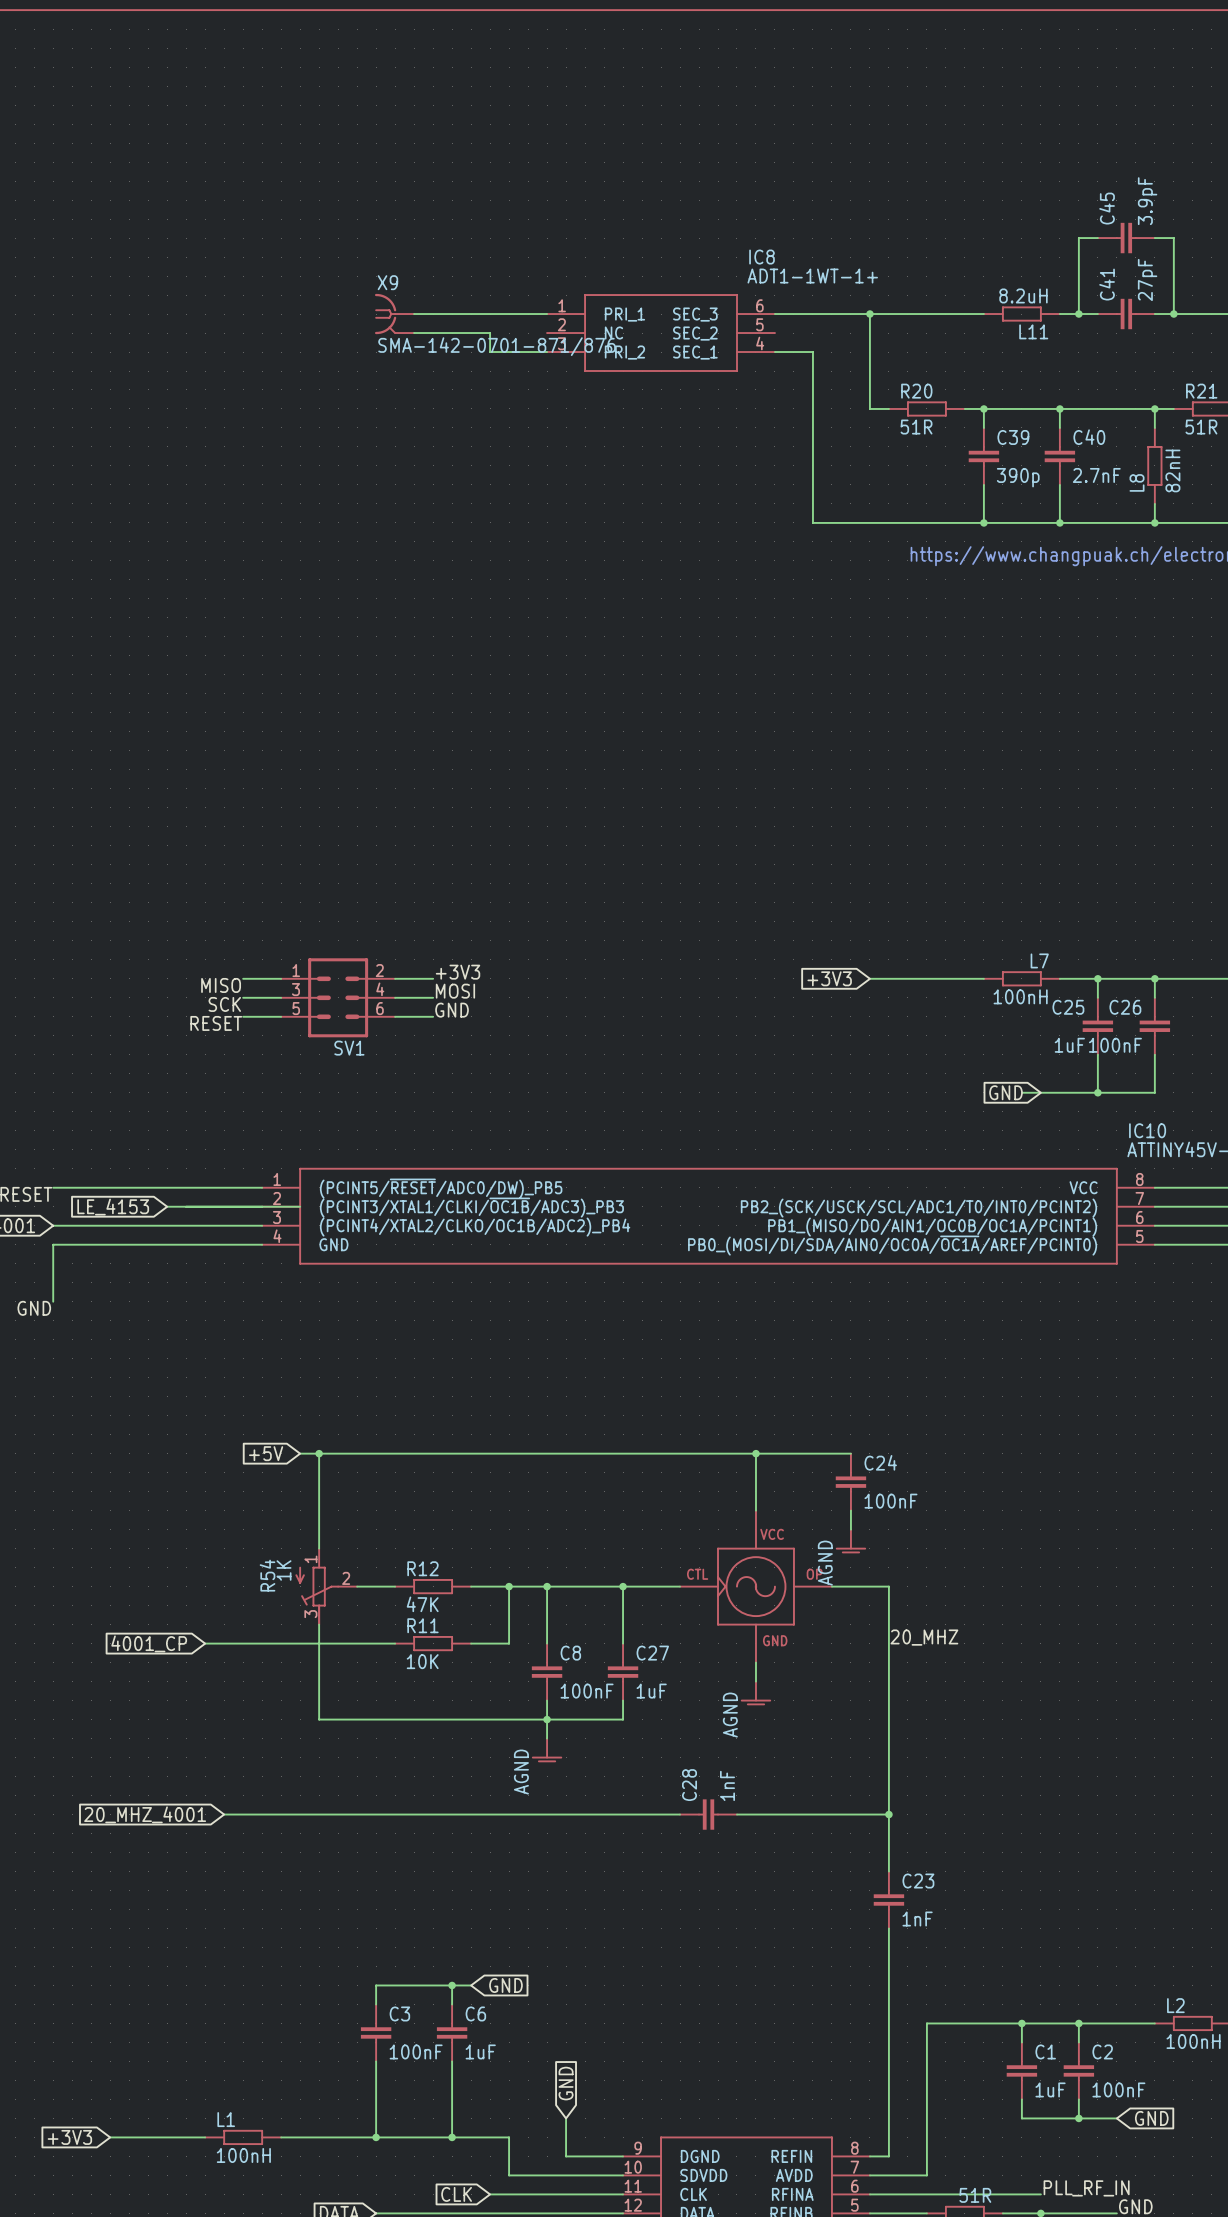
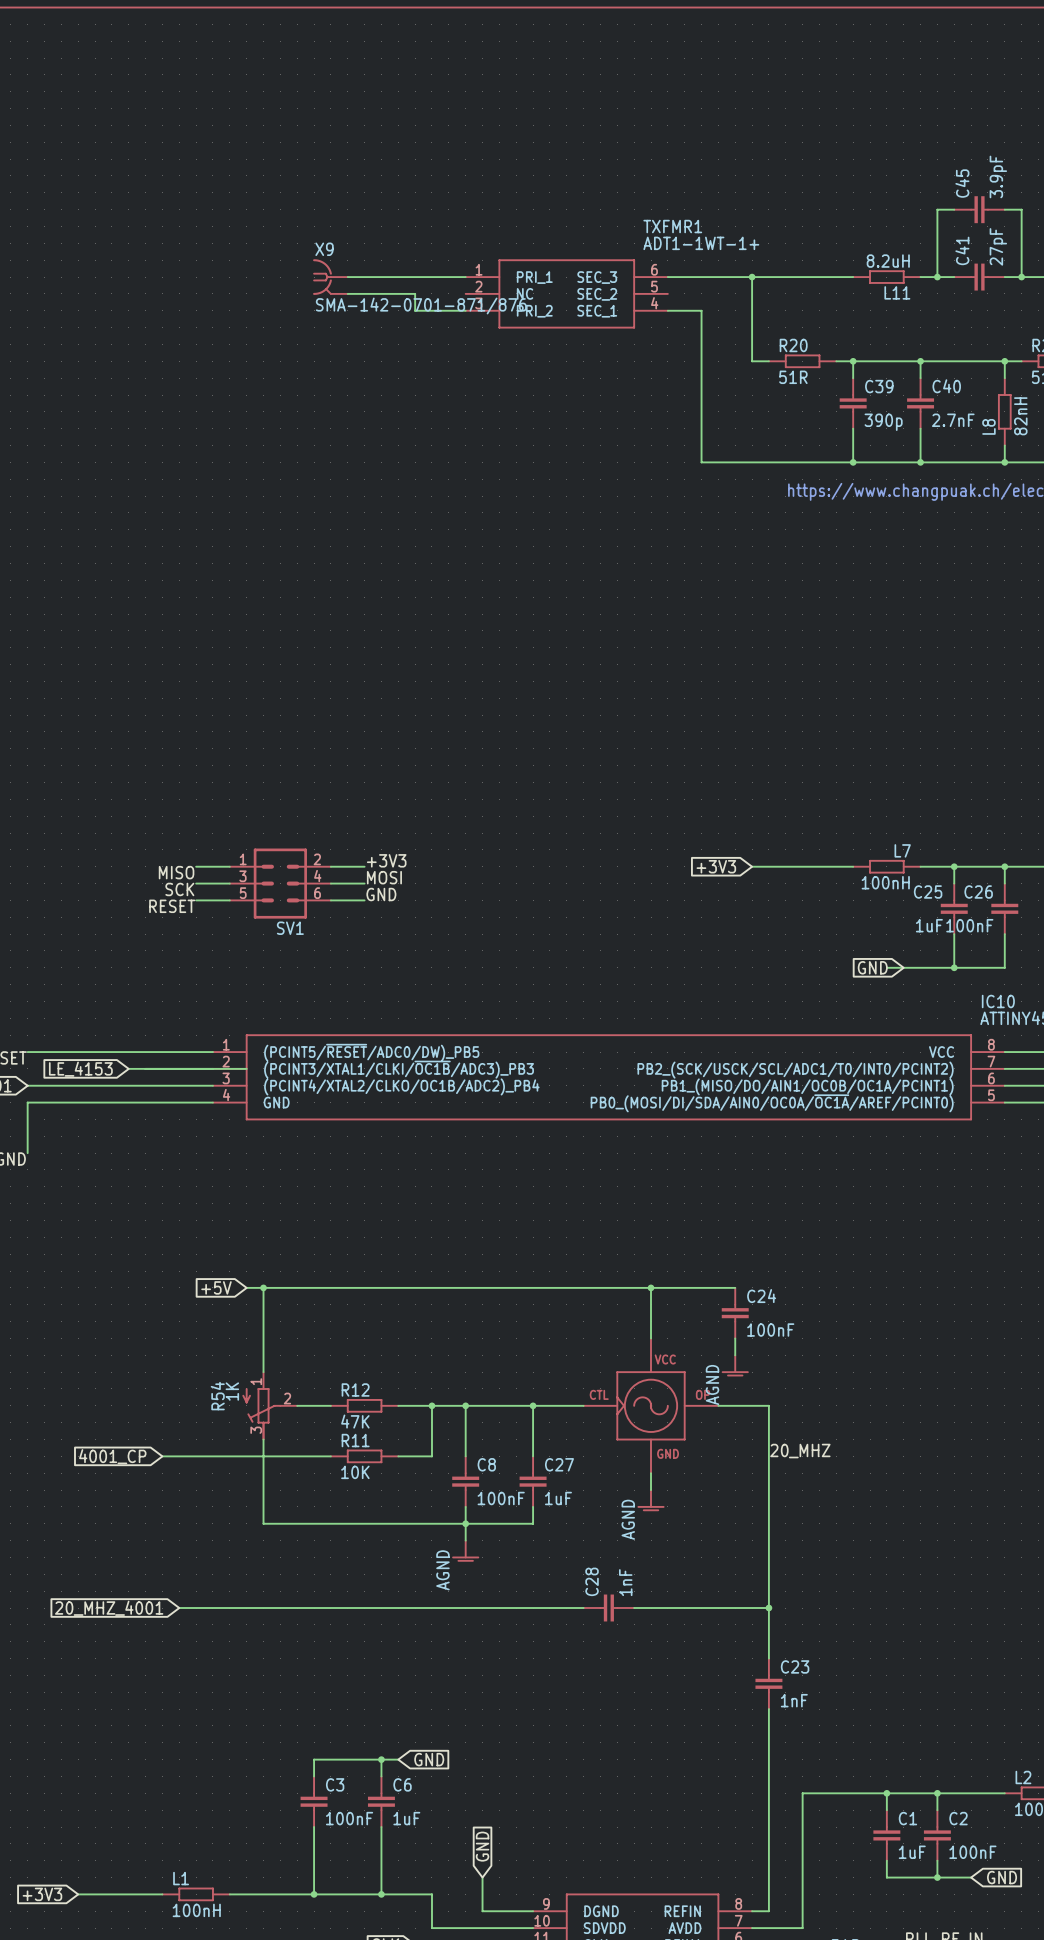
IC8 name: IC8 (762, 257) -> TXFMR1 (672, 226)

